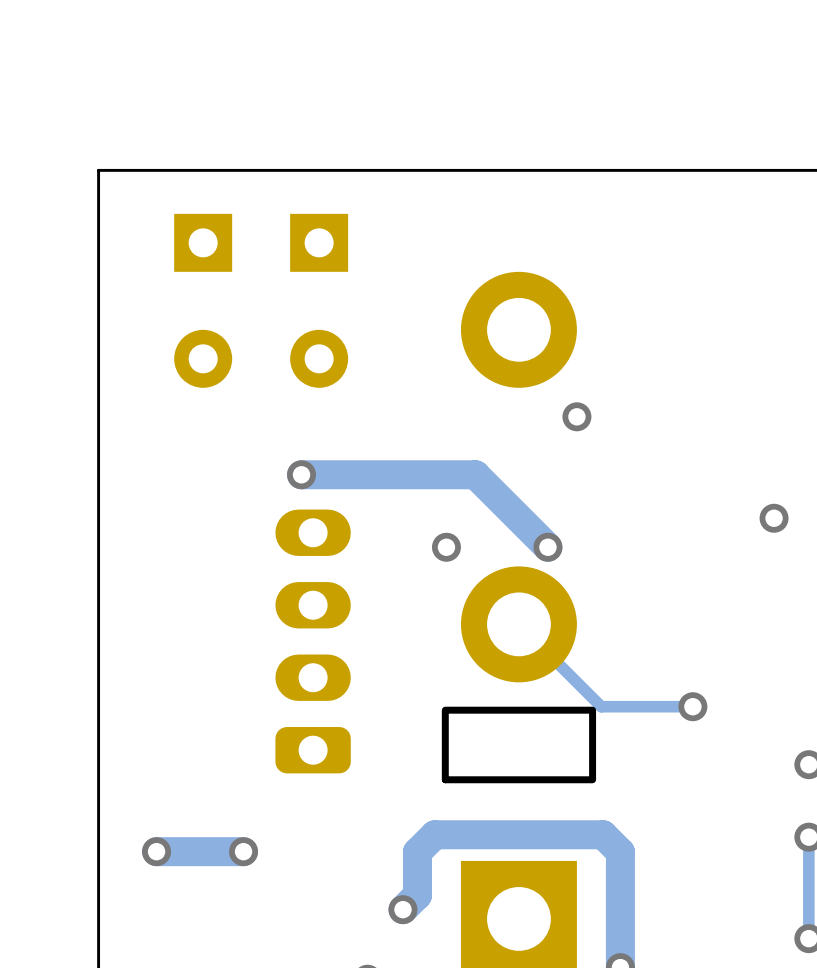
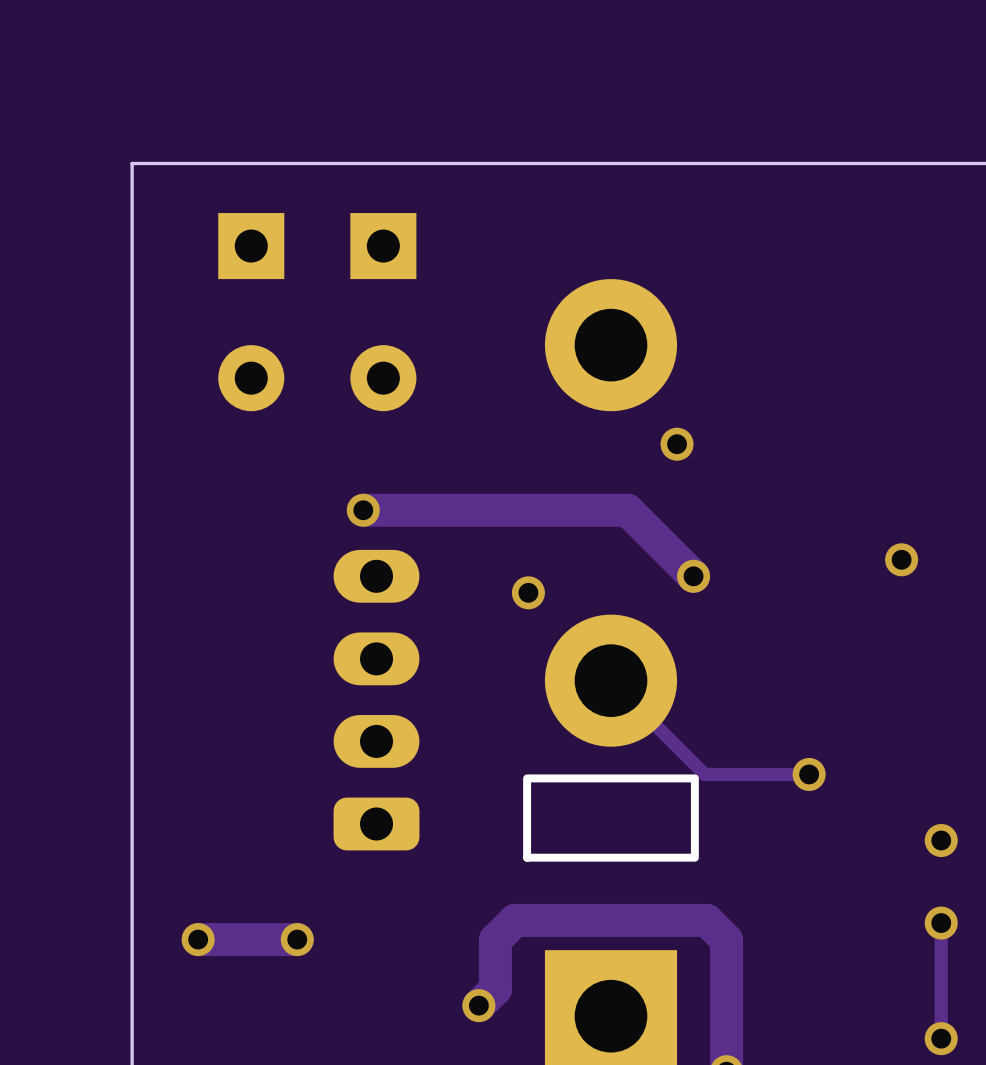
track: (475, 474) (547, 547) -> (561, 510) (627, 510) (693, 576)
via position: (547, 547) -> (693, 576)

